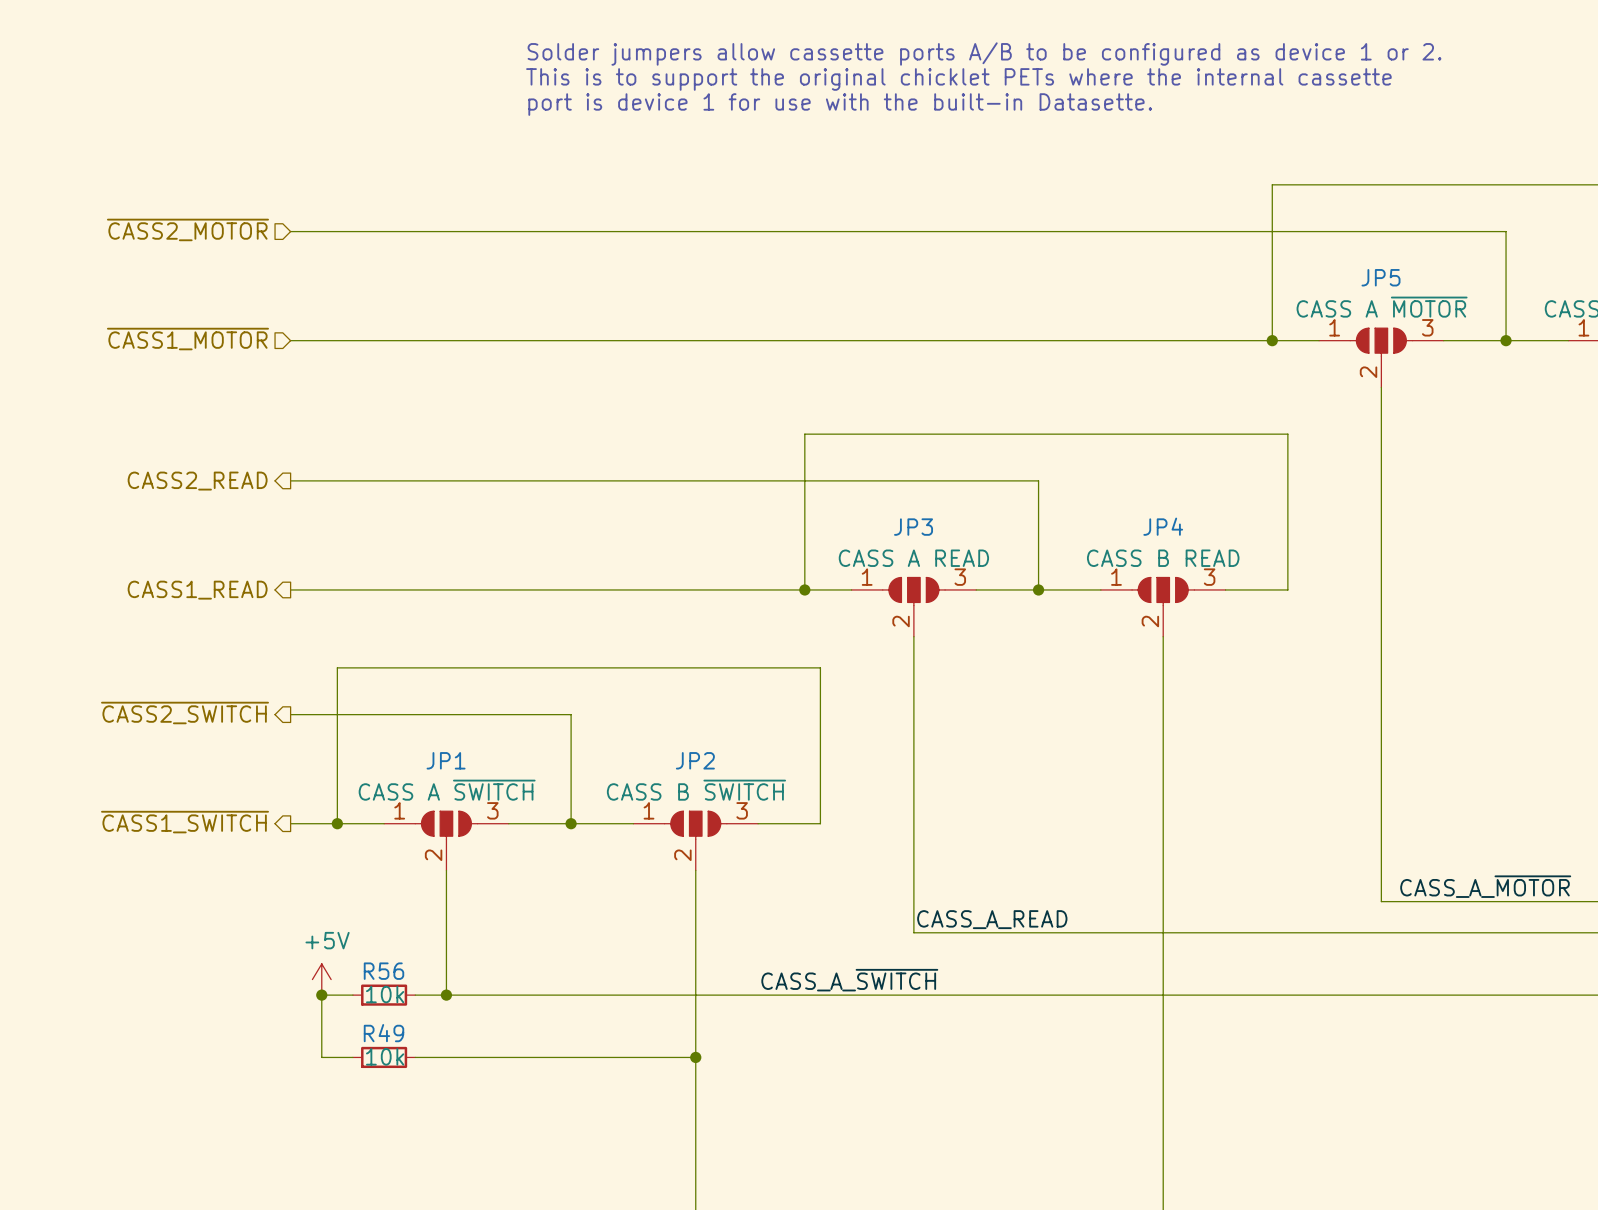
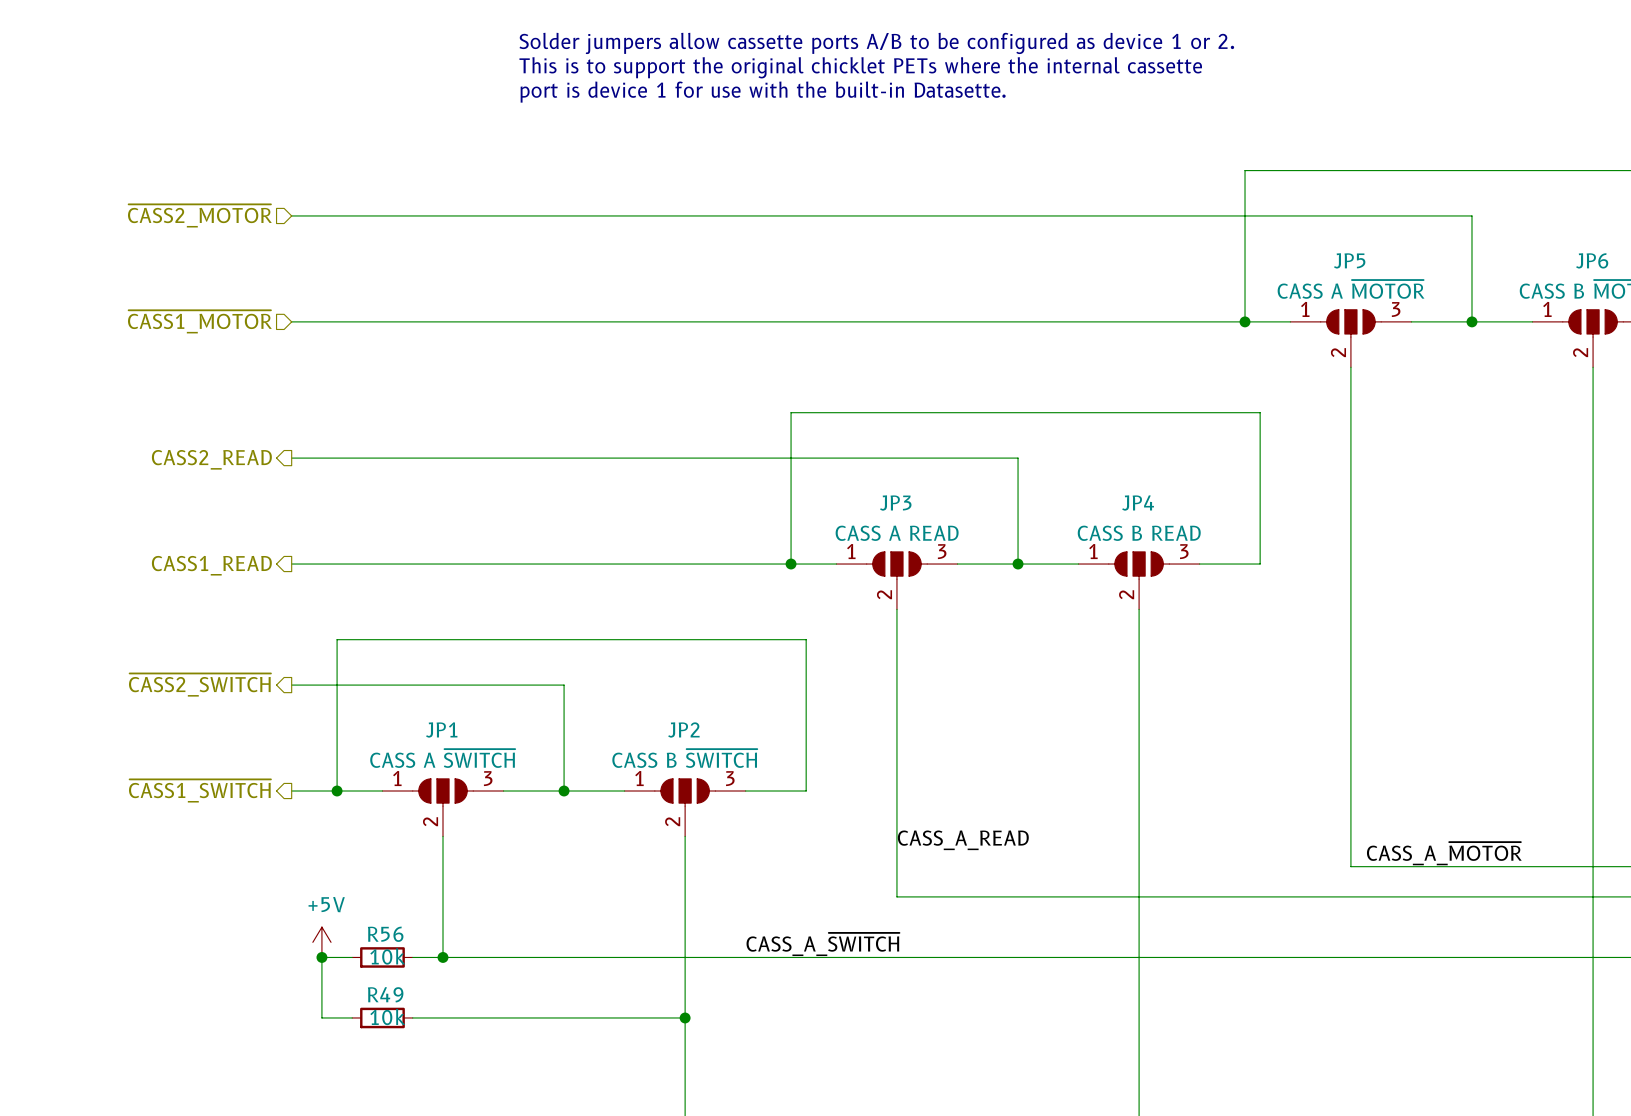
label position: CASS_A_READ (992, 919) -> CASS_A_READ (963, 840)

